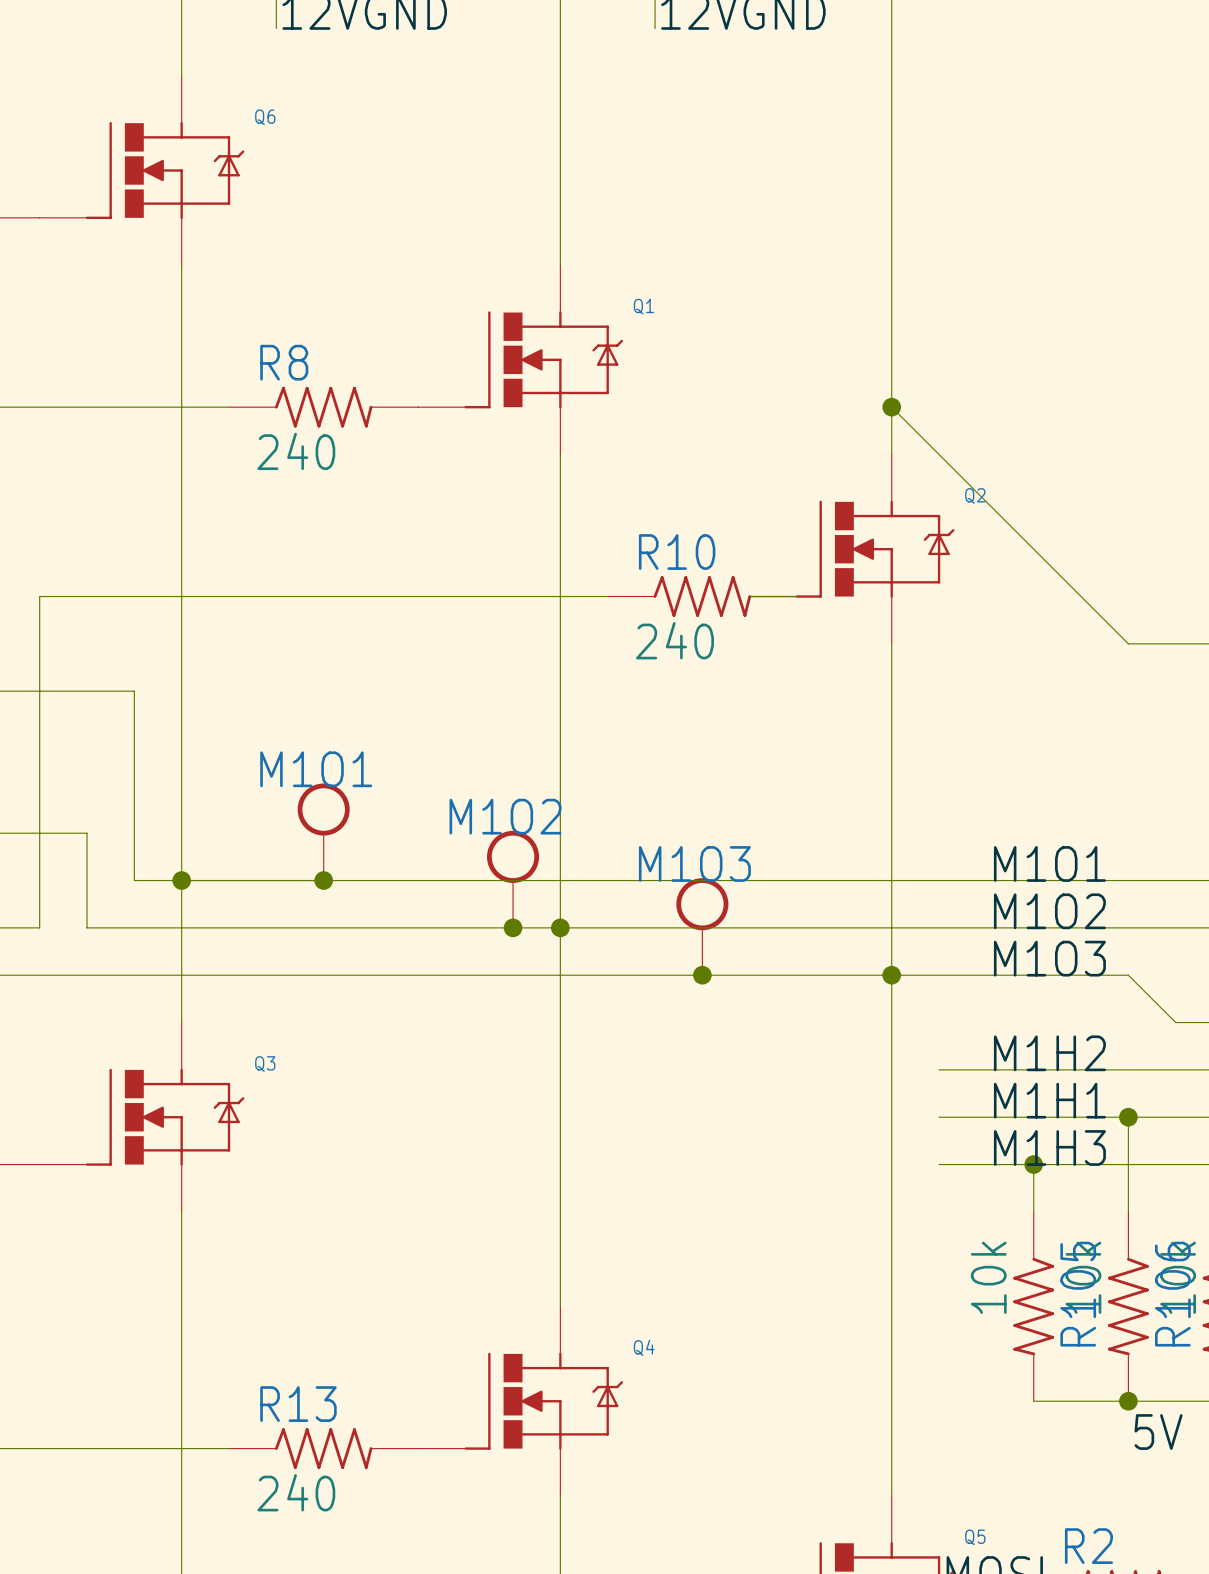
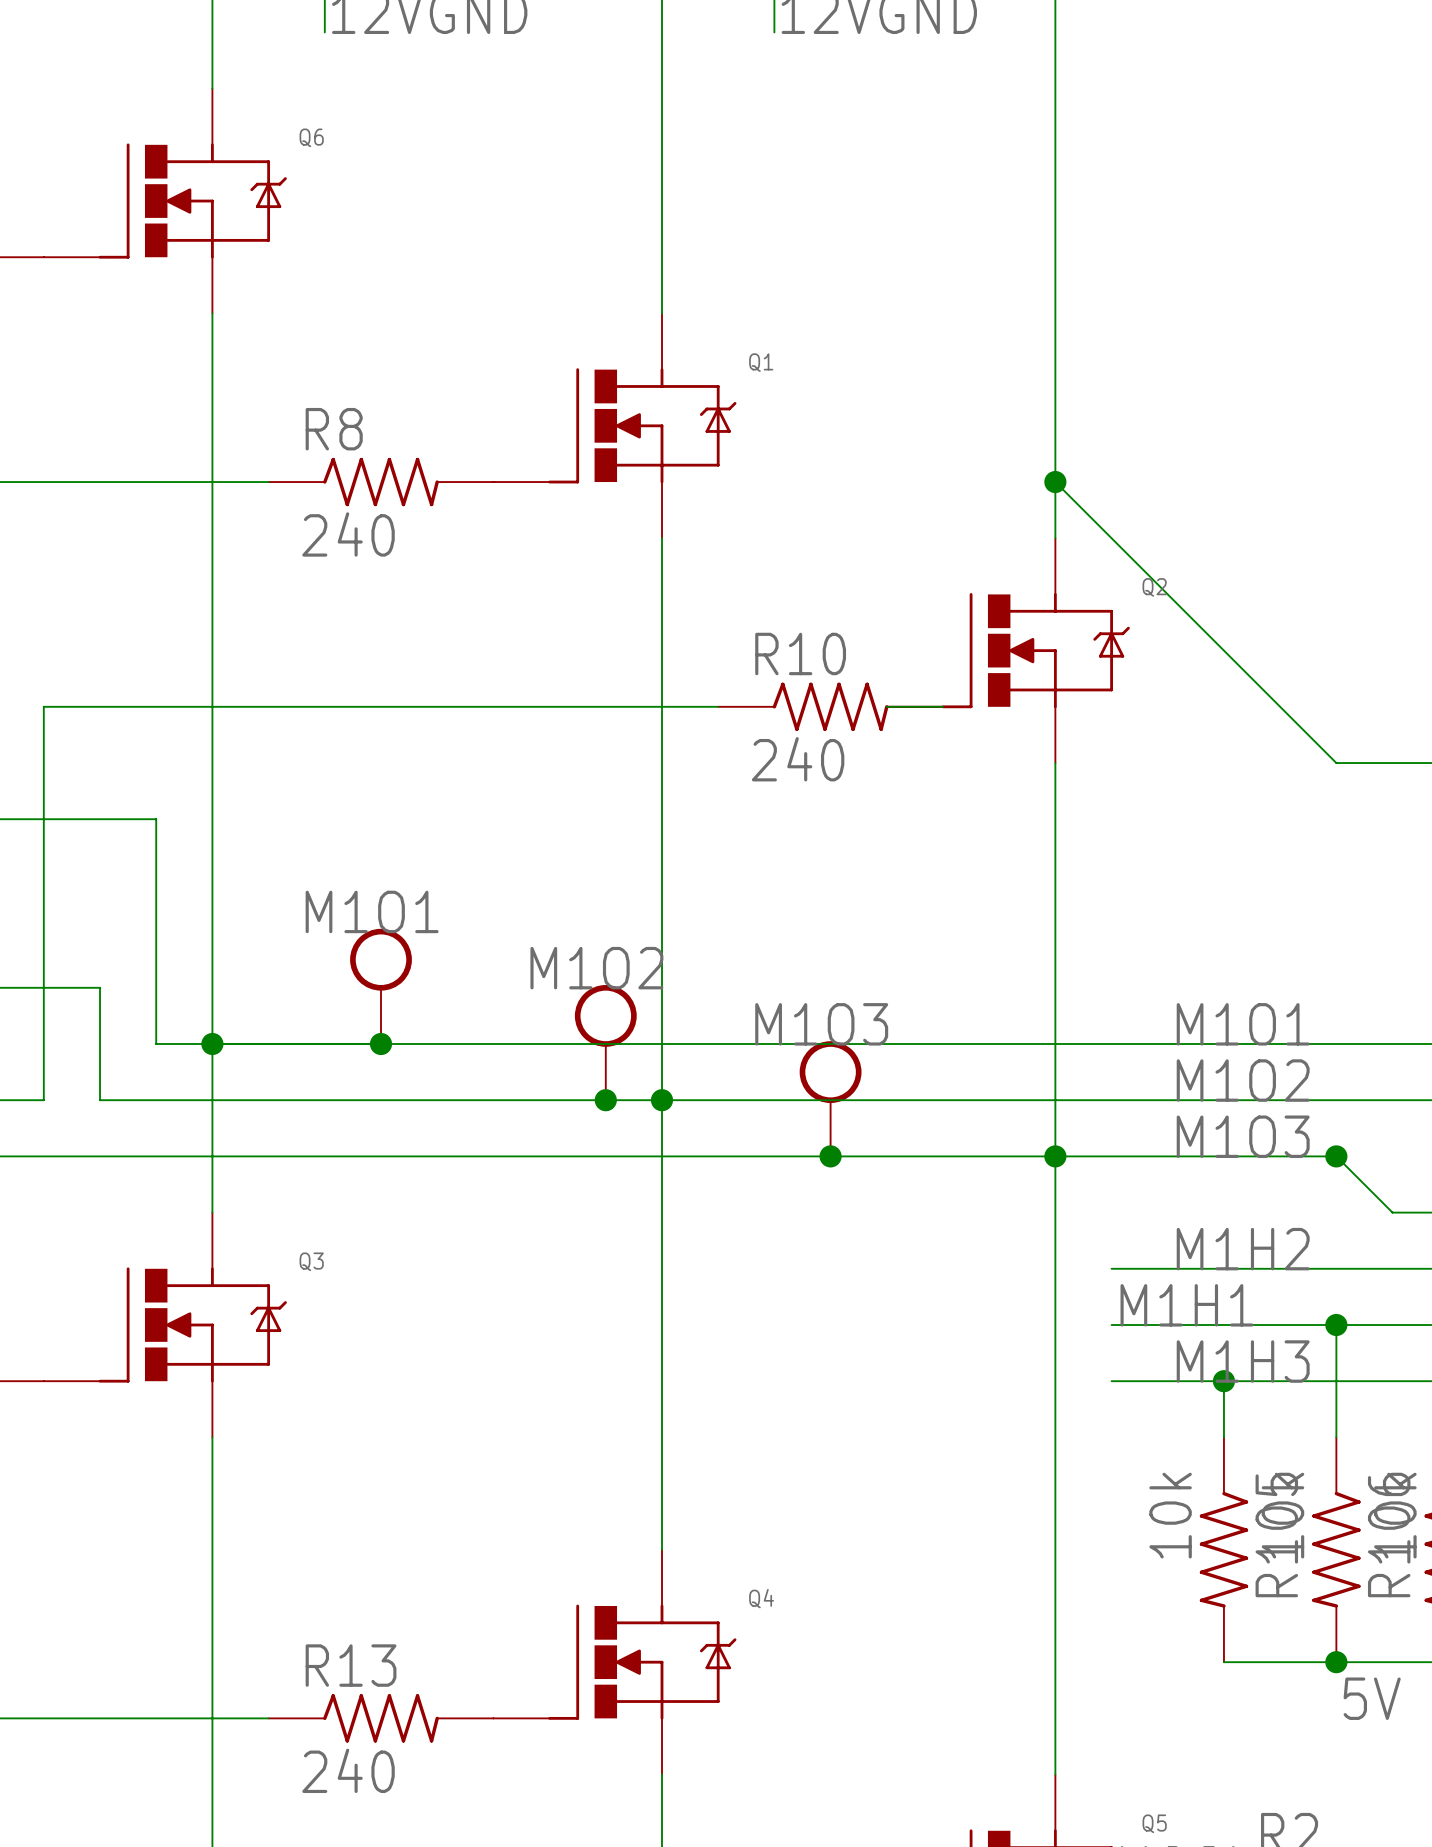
junction: none -> (1336, 1156)
label position: M1H1 (1049, 1100) -> M1H1 (1186, 1305)

